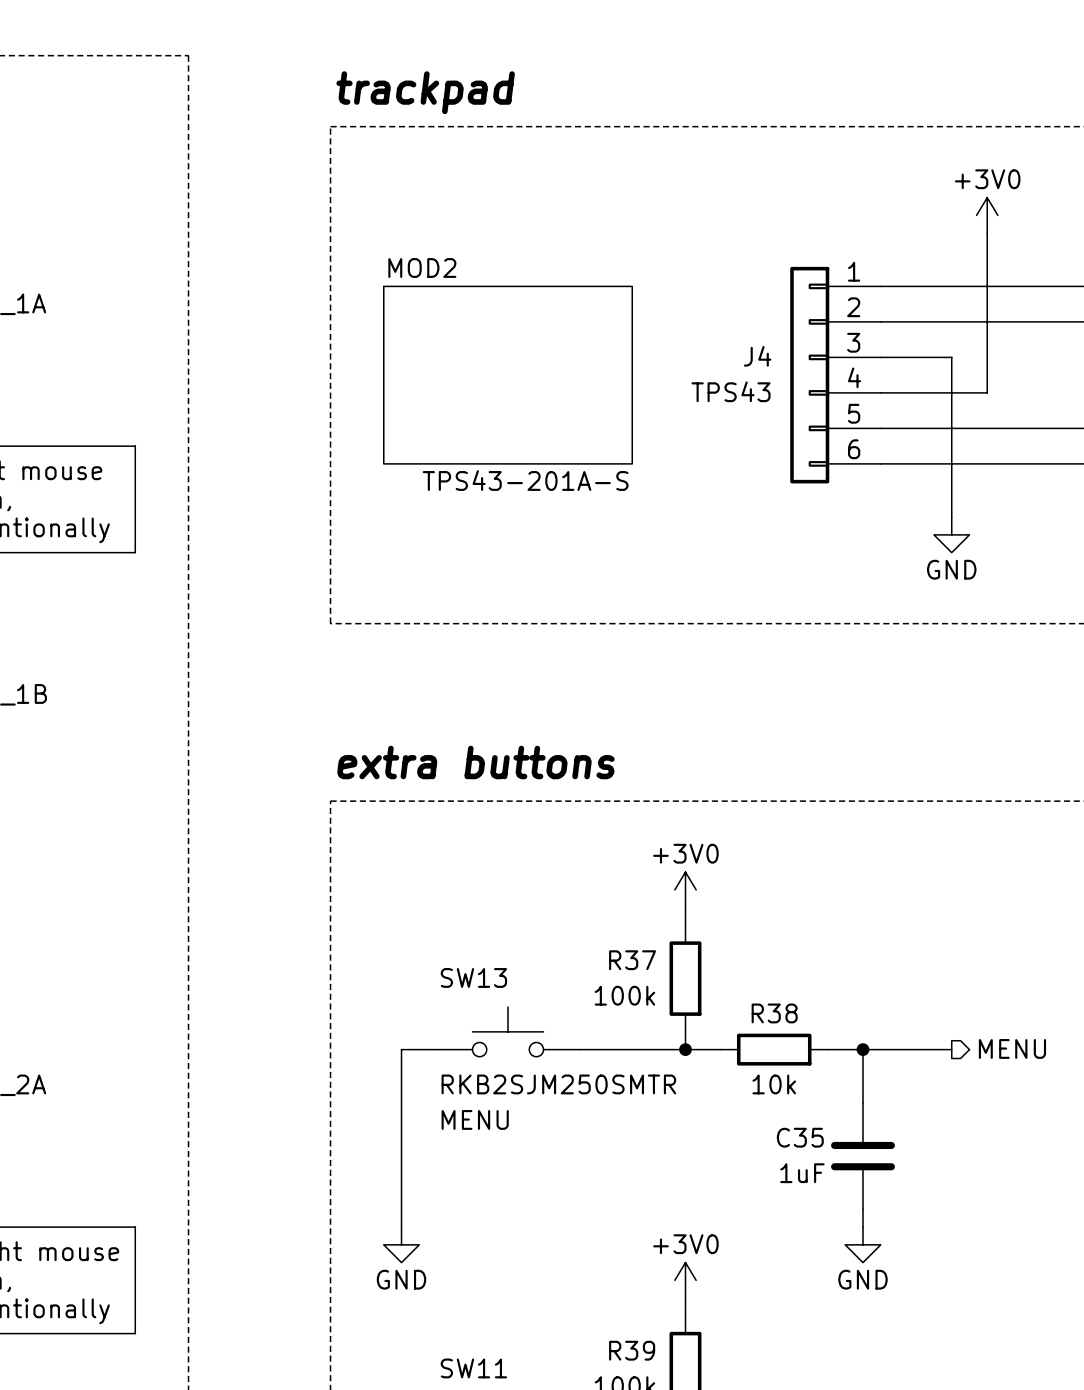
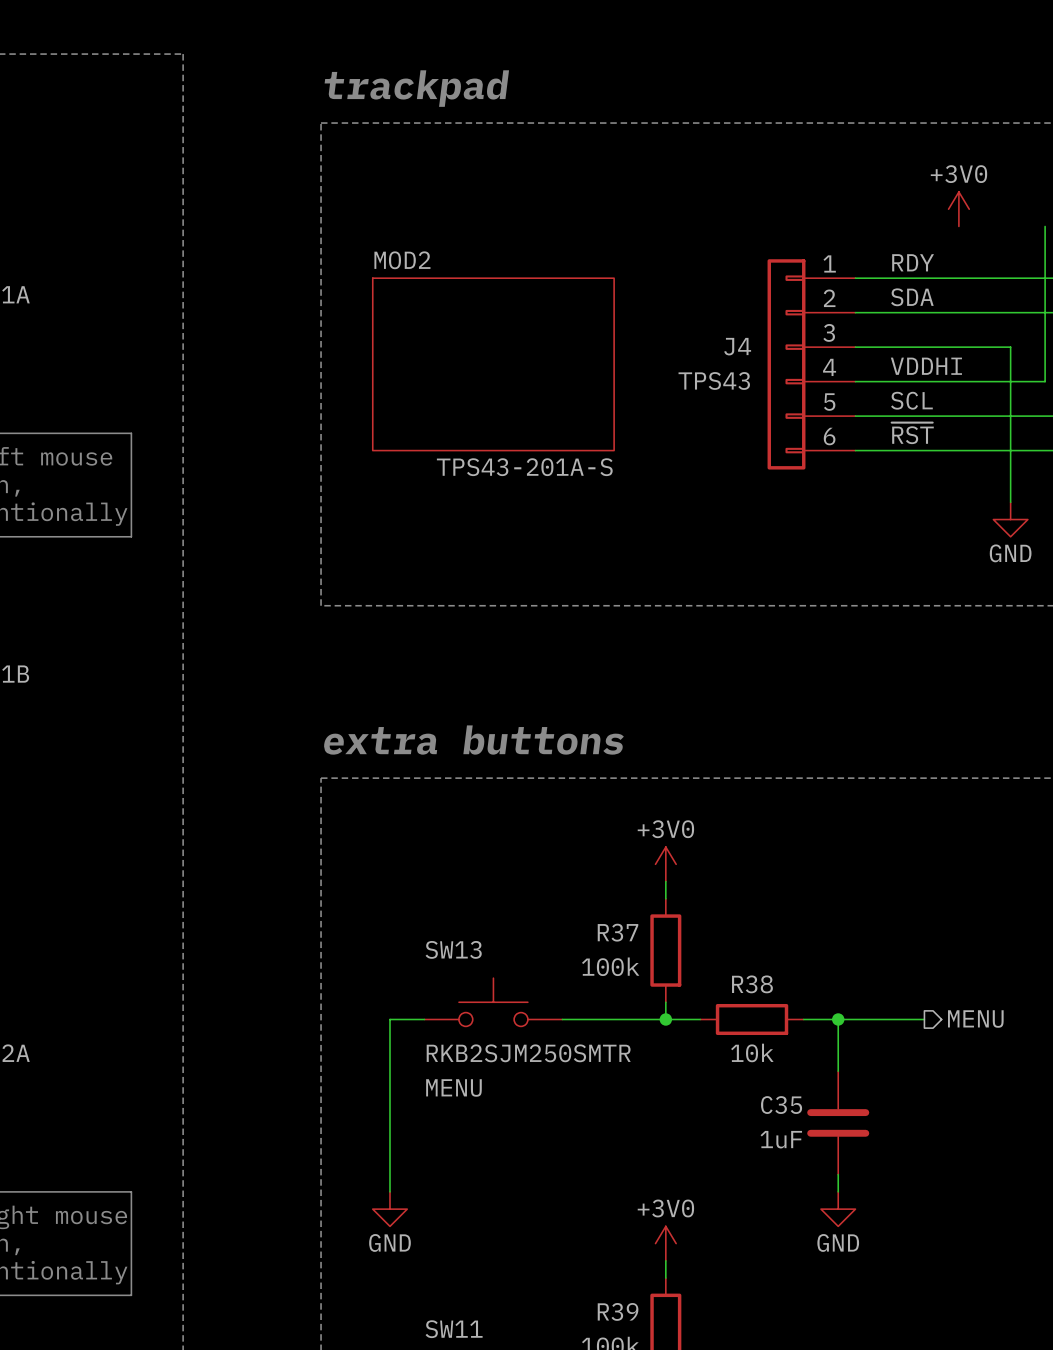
wire: (987, 233) (987, 392) -> (1045, 226) (1045, 381) (958, 381)
label: none -> RDY (913, 262)
label: none -> SDA (912, 297)
wire: (951, 357) (951, 517) -> (924, 347) (1010, 347) (1010, 502)
label: none -> VDDHI (926, 366)
label: none -> SCL (911, 400)
label: none -> ~{RST} (912, 433)
power symbol position: GND (951, 534) -> GND (1010, 519)

